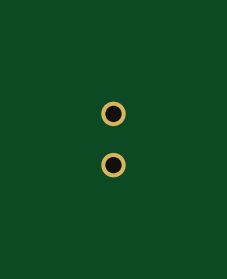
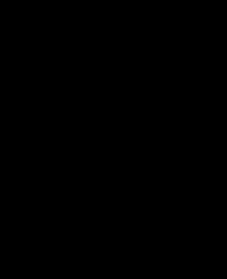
part: (113, 113) -> none
part: (113, 165) -> none

